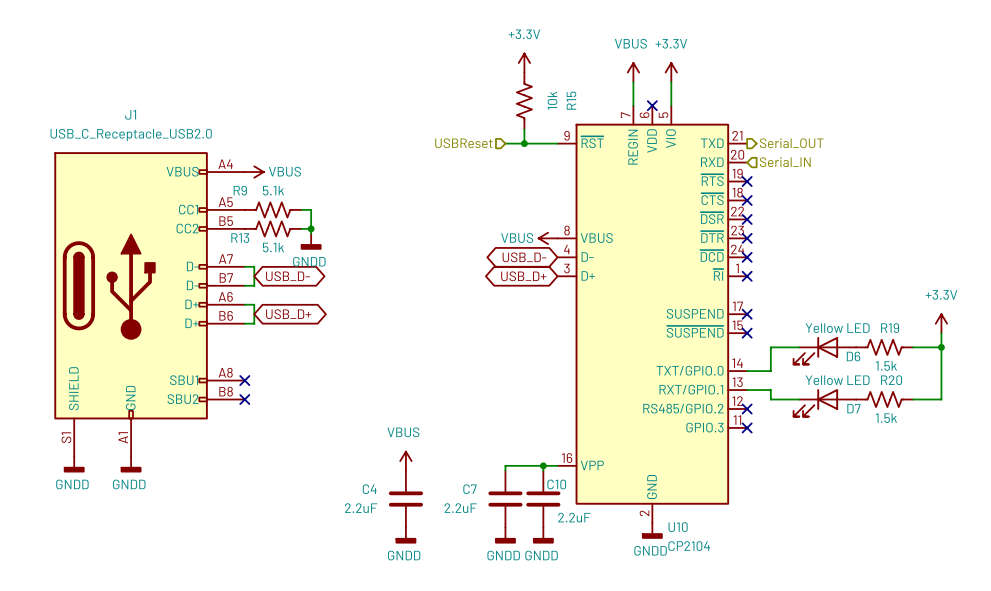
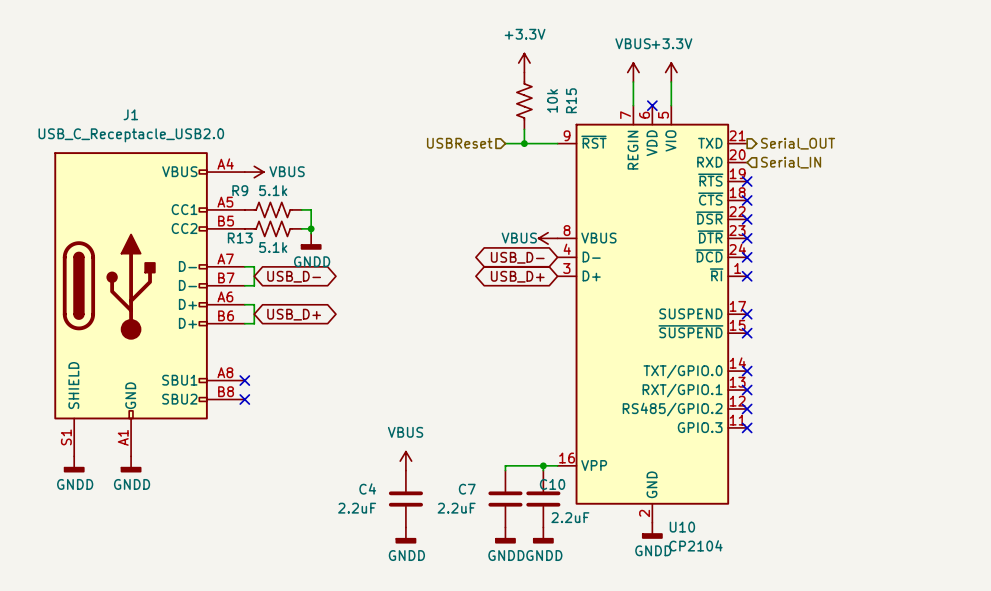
power symbol: +3.3V (941, 323) -> none
wire: (941, 333) (941, 399) (913, 399) -> none
wire: (799, 347) (770, 347) (770, 371) (747, 371) -> none
R19: 1.5k (884, 347) -> none
wire: (913, 347) (941, 347) -> none
junction: (941, 347) -> none
D6: Yellow LED (824, 350) -> none
no-connect mark: none -> (747, 371)
wire: (747, 390) (770, 390) (770, 399) (799, 399) -> none
no-connect mark: none -> (747, 390)
R20: 1.5k (884, 399) -> none
D7: Yellow LED (824, 402) -> none

